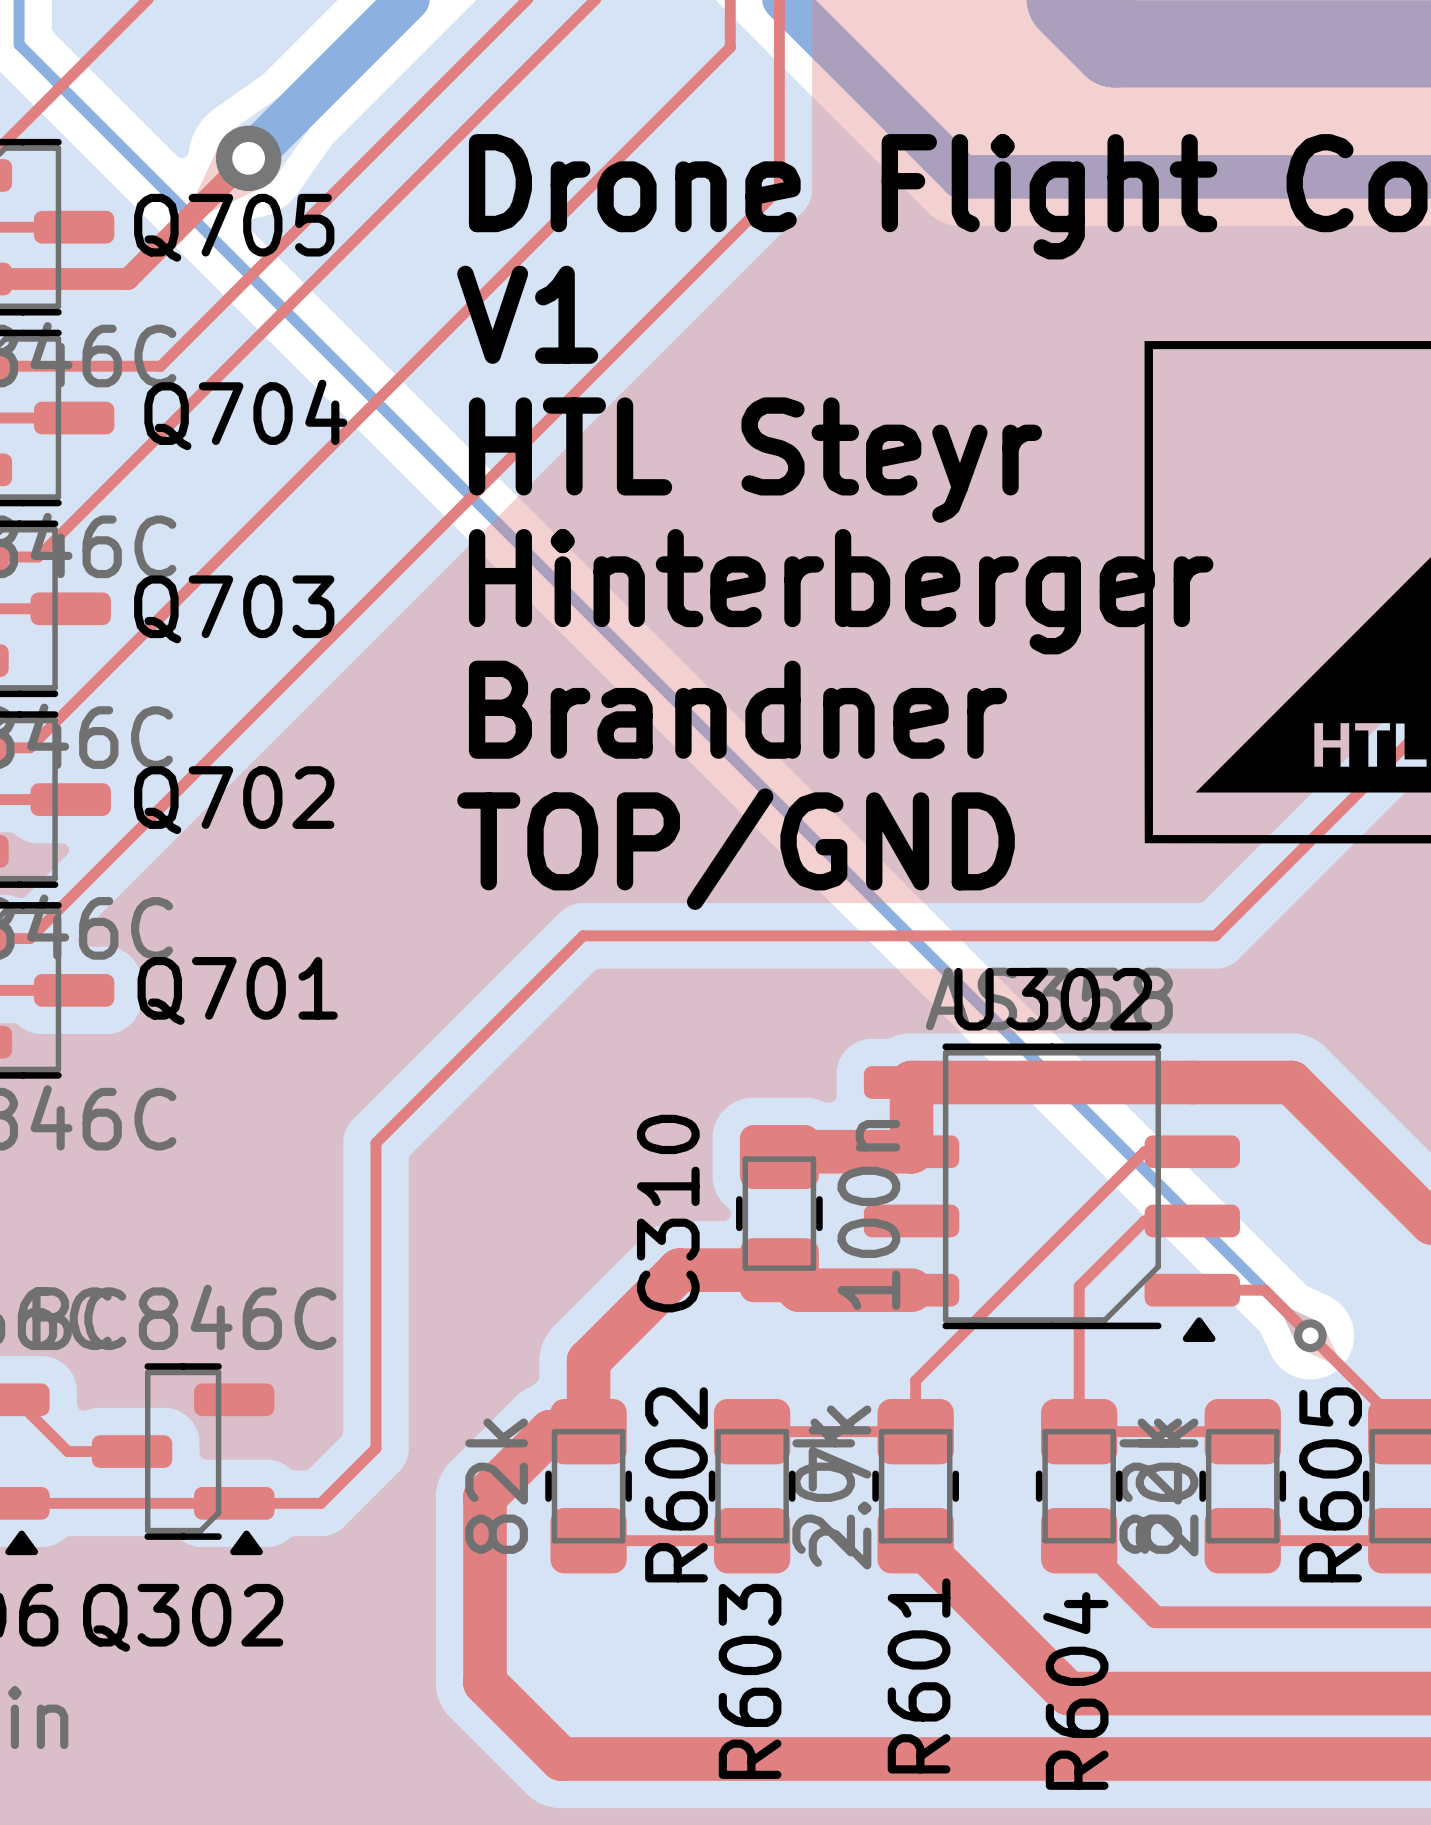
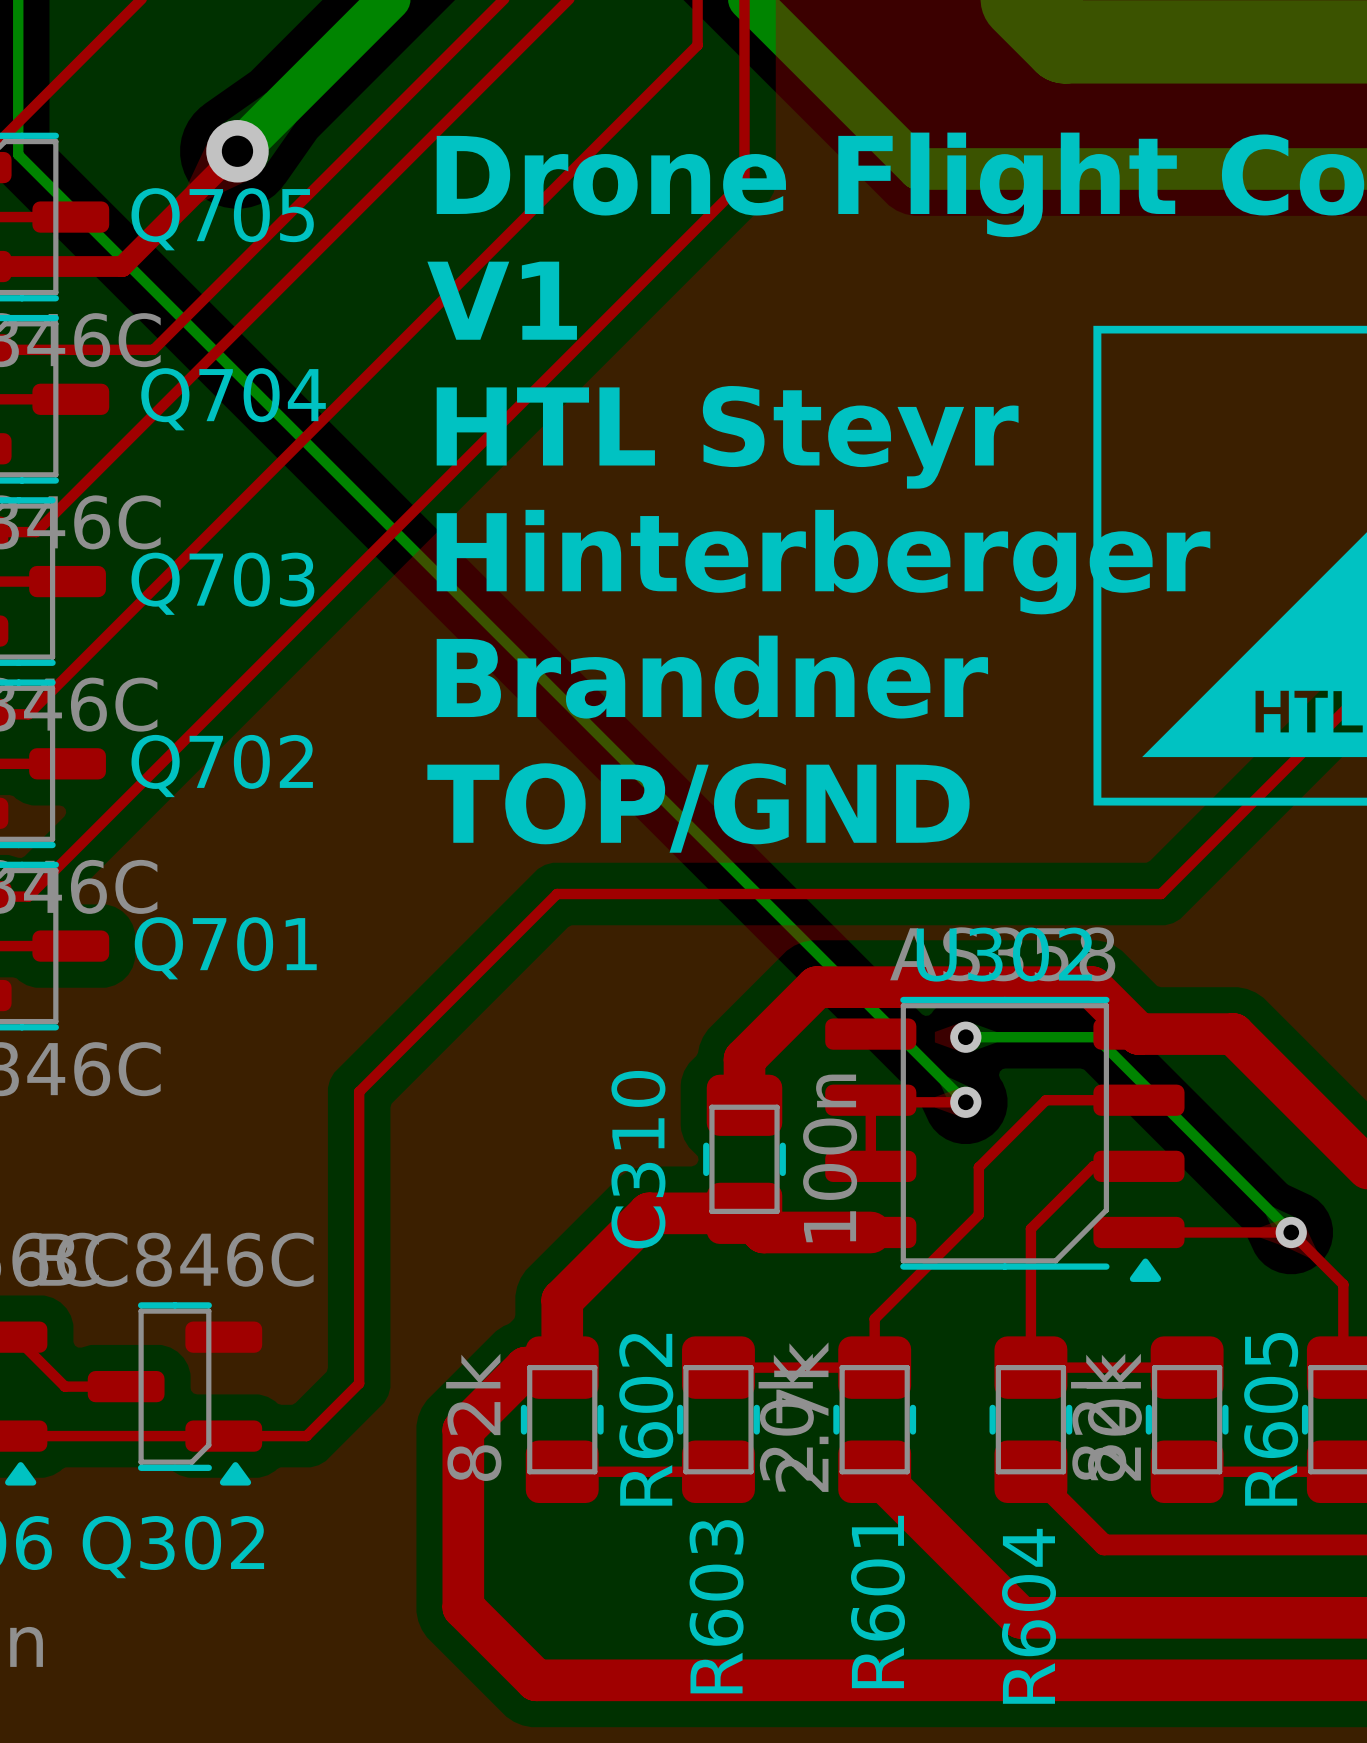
bottom track: (19, 44) (1310, 1335) -> (18, 42) (18, 154) (965, 1102)
top track: (1192, 1082) (911, 1082) (911, 1151) (784, 1151) (779, 1157) -> (1138, 1034) (1092, 987) (816, 987) (744, 1059) (744, 1105)
bottom track: none -> (965, 1037) (1096, 1037) (1291, 1232)
via: none -> (965, 1037)
top track: (1144, 1151) (1024, 1271) -> (1093, 1100) (1046, 1100) (978, 1167) (978, 1214)
top track: none -> (965, 1102) (872, 1102) (870, 1100) (870, 1166)
via: none -> (965, 1102)
top track: (1264, 1290) (1406, 1431) -> (1208, 1232) (1291, 1232) (1343, 1284) (1343, 1367)
via position: (1310, 1335) -> (1291, 1232)

